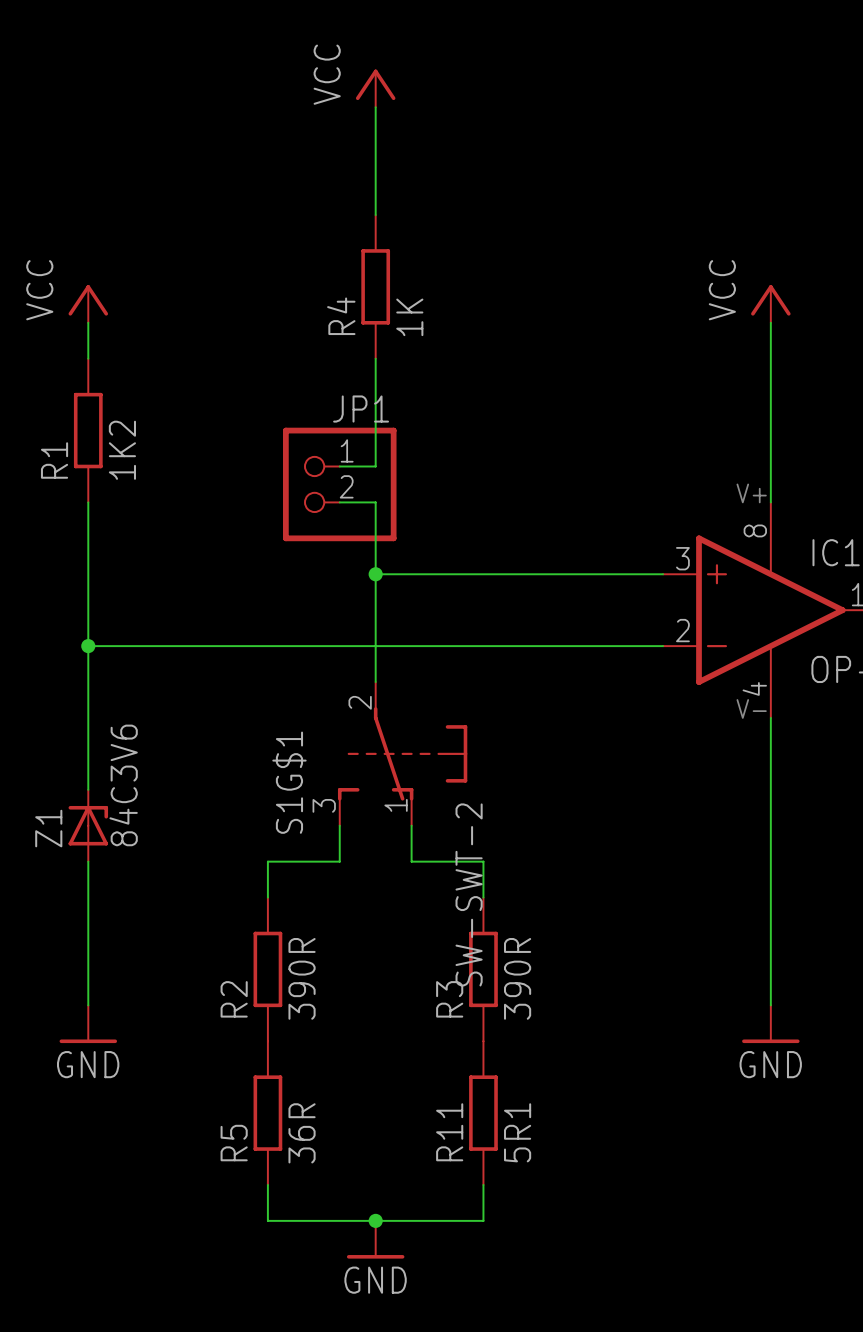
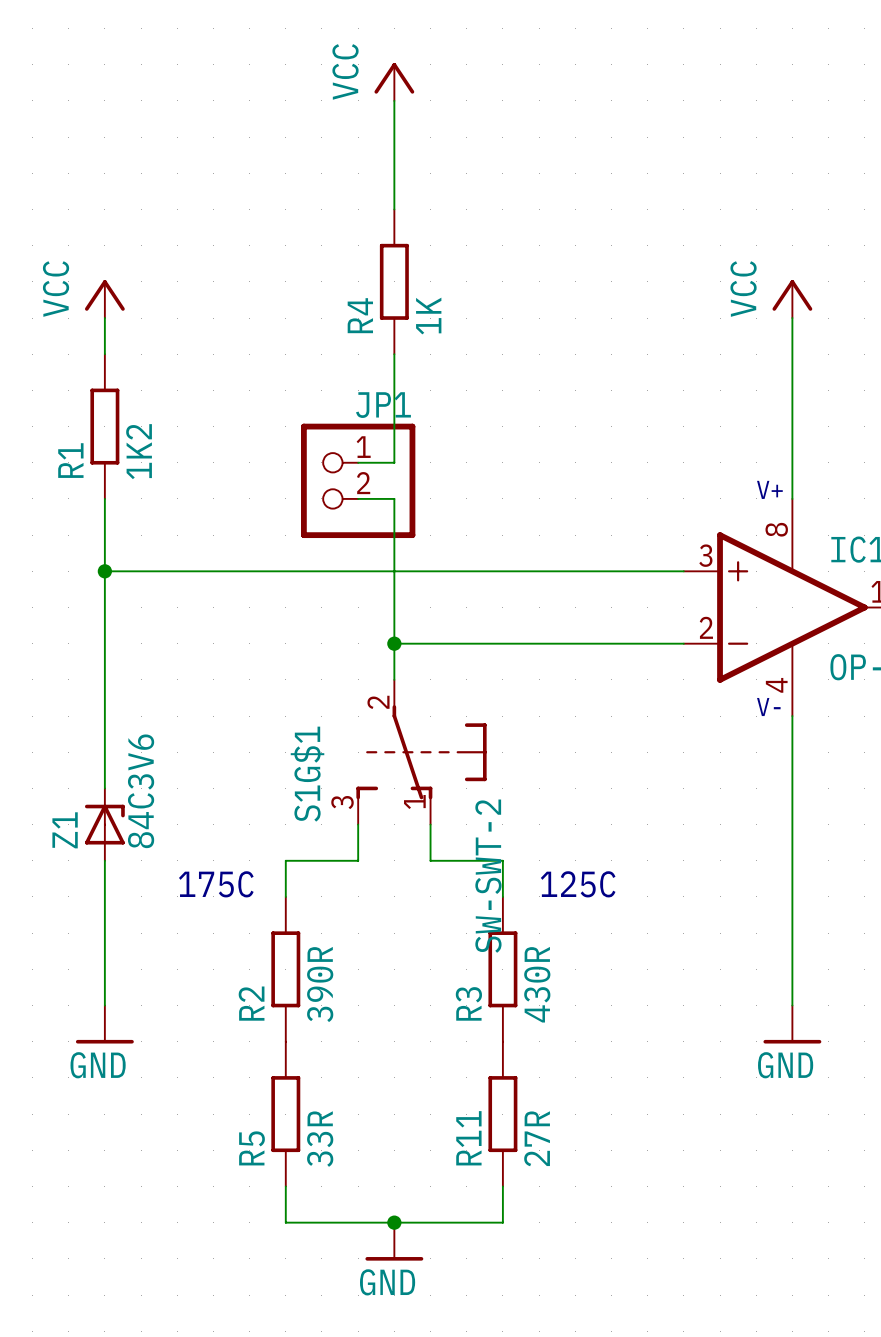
junction position: (375, 574) -> (394, 643)
wire: (88, 646) (375, 646) -> (104, 571) (394, 571)
junction position: (88, 646) -> (104, 571)
text: none -> 175C (216, 884)
text: none -> 125C (578, 884)
R3 value: 390R (517, 978) -> 430R (537, 984)
R11 value: 5R1 (517, 1132) -> 27R (537, 1138)
R5 value: 36R (302, 1133) -> 33R (320, 1139)

